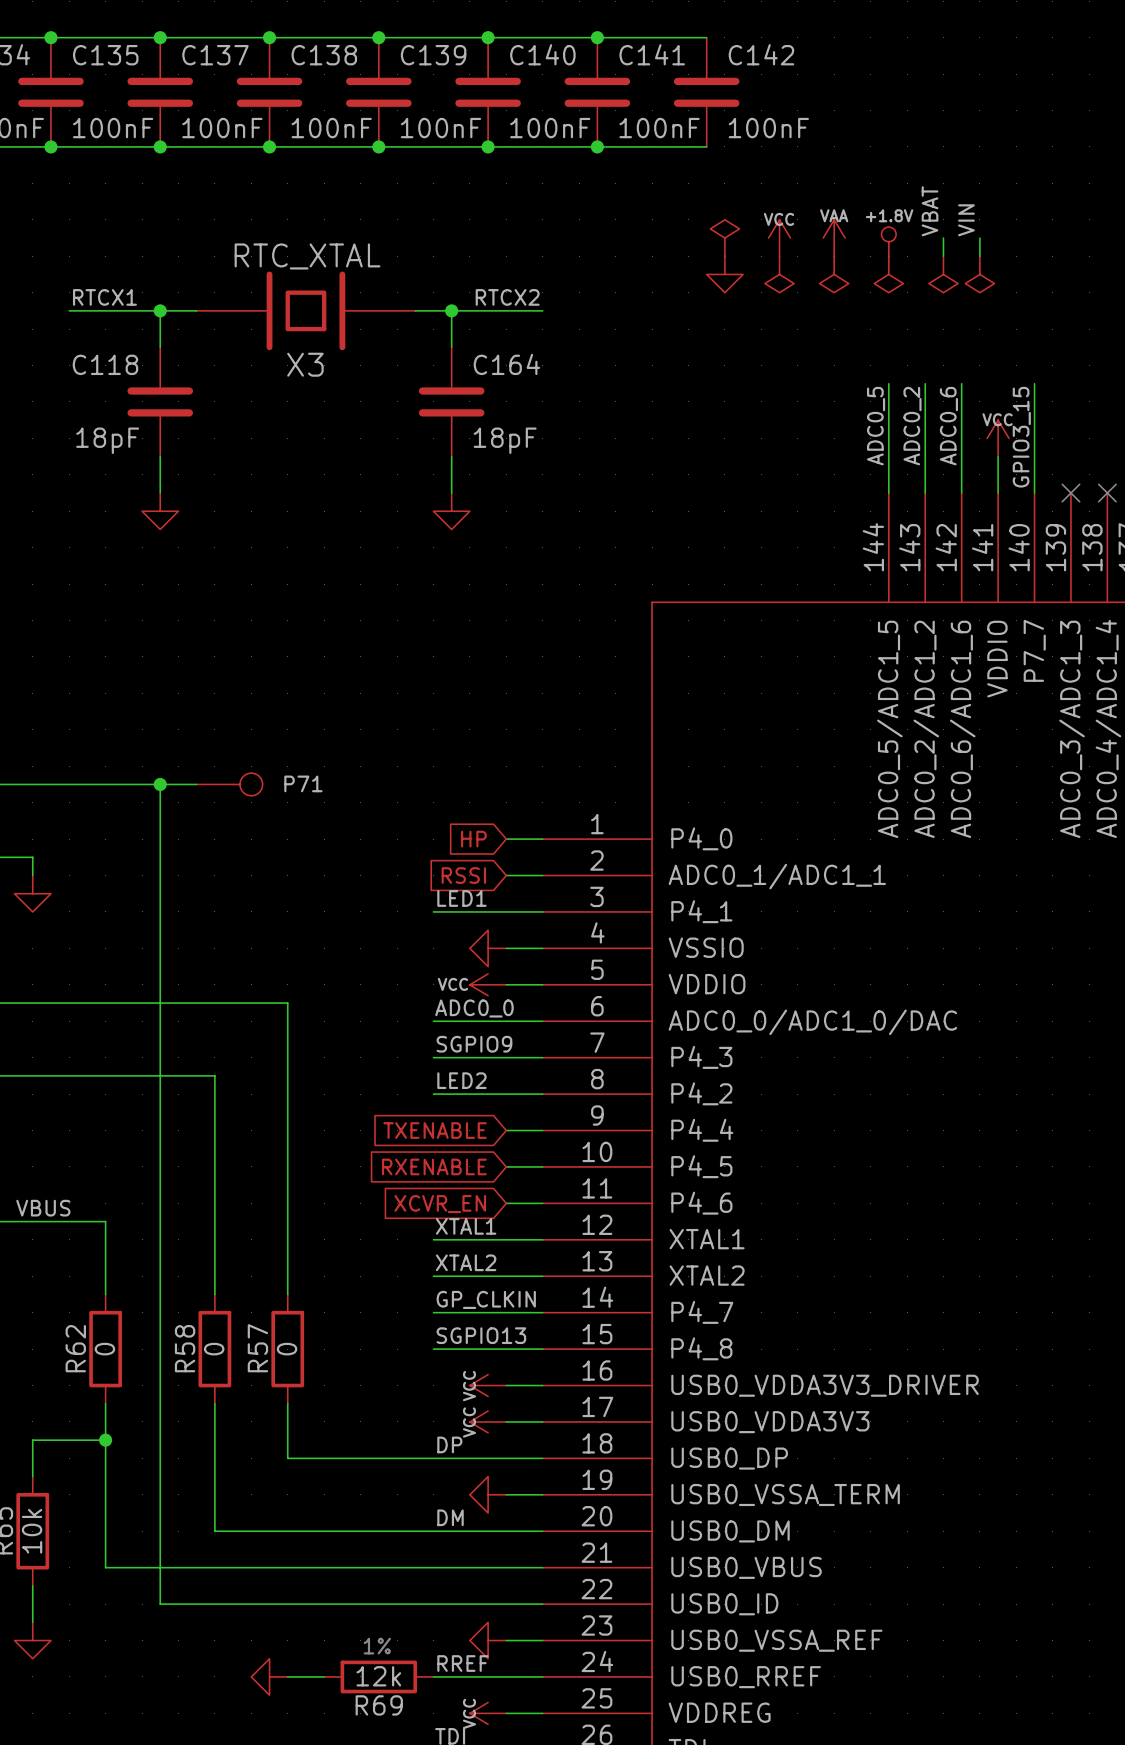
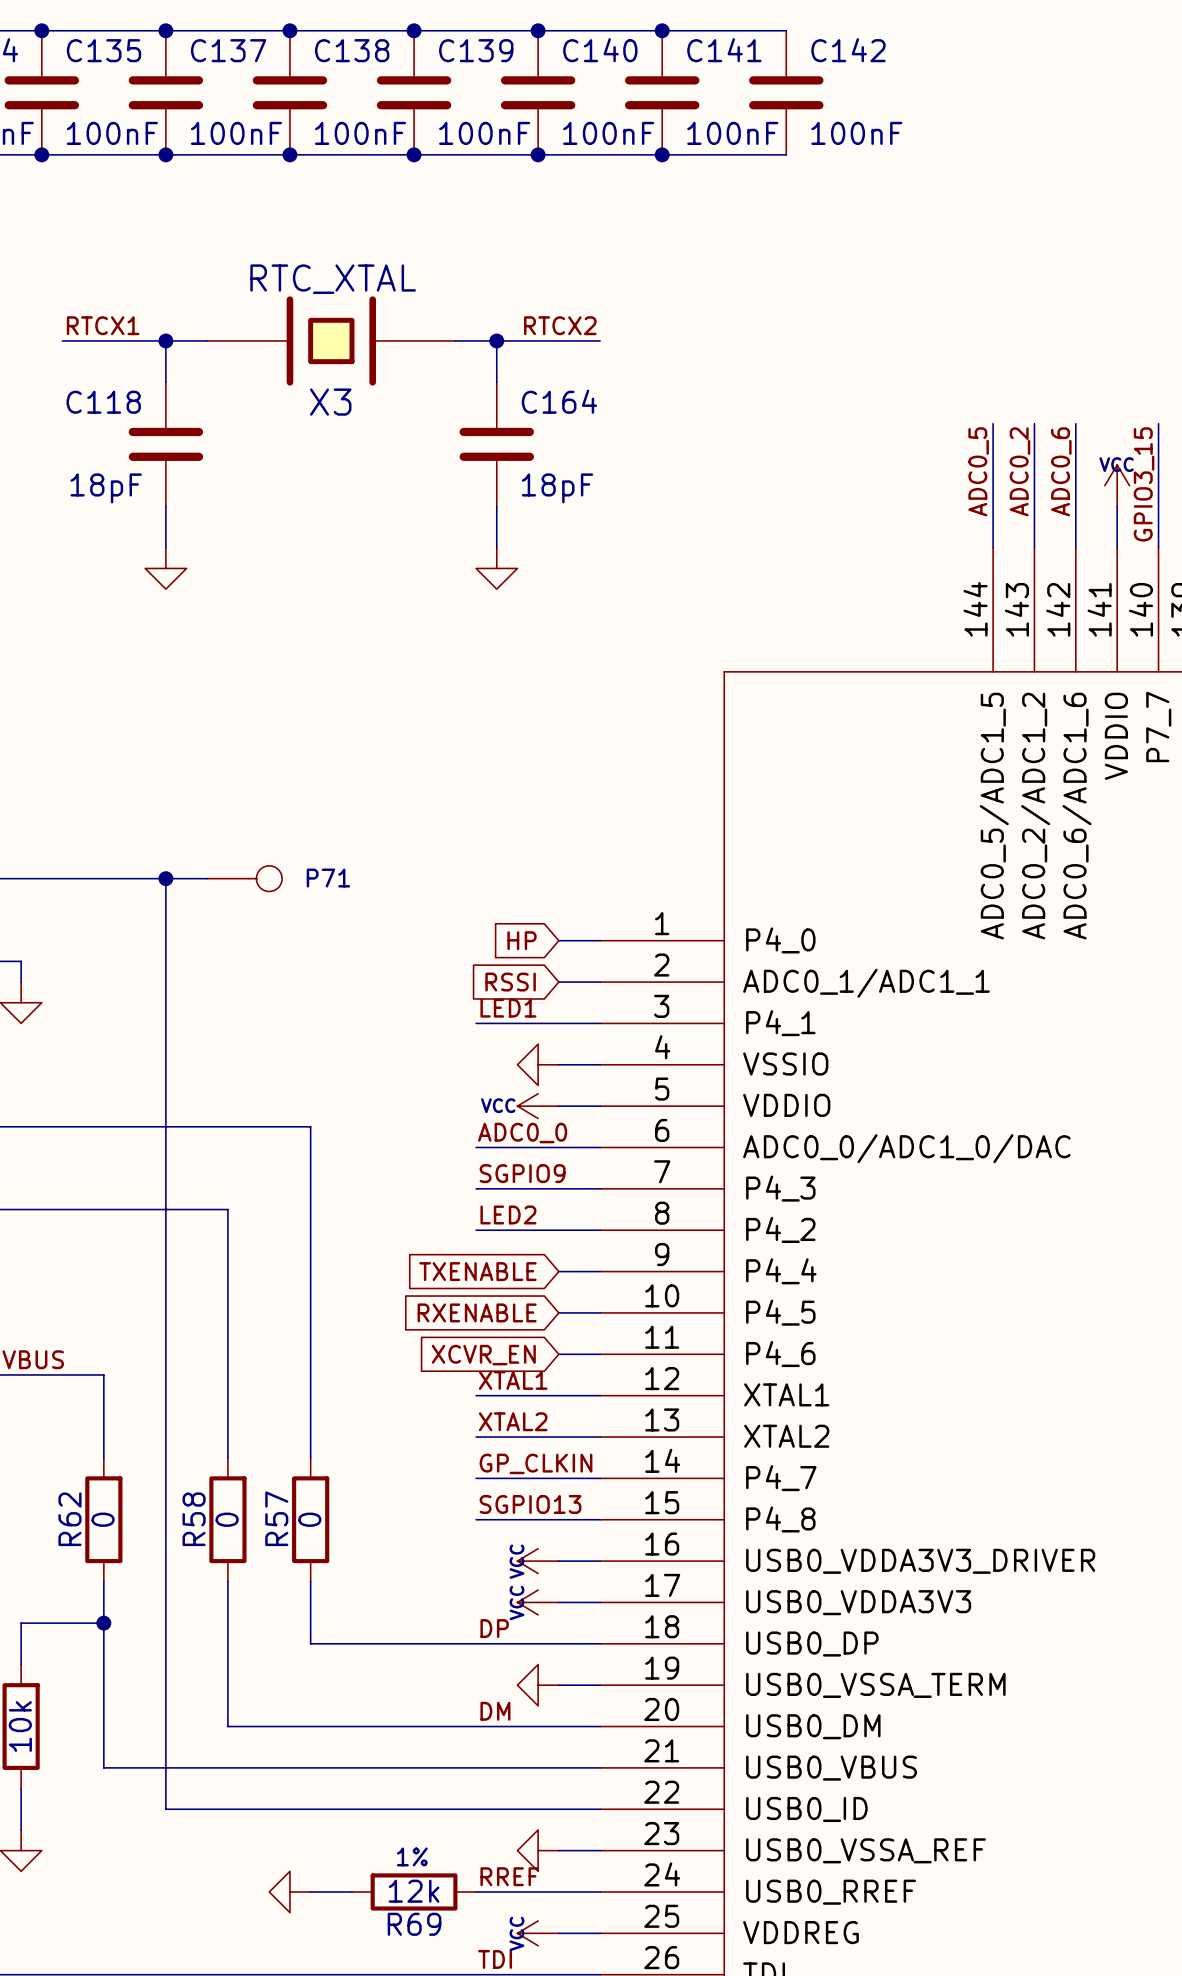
label: VBAT (930, 211) -> none
label: VIN (966, 220) -> none
power symbol: (724, 238) -> none
power symbol: VCC (779, 238) -> none
power symbol: VAA (834, 238) -> none
wire: (943, 238) (943, 256) -> none
wire: (979, 238) (979, 256) -> none
power symbol: +1.8V (888, 241) -> none
power symbol: (724, 274) -> none
power symbol: (779, 274) -> none
power symbol: (834, 274) -> none
power symbol: (888, 274) -> none
power symbol: (943, 274) -> none
power symbol: (979, 274) -> none

